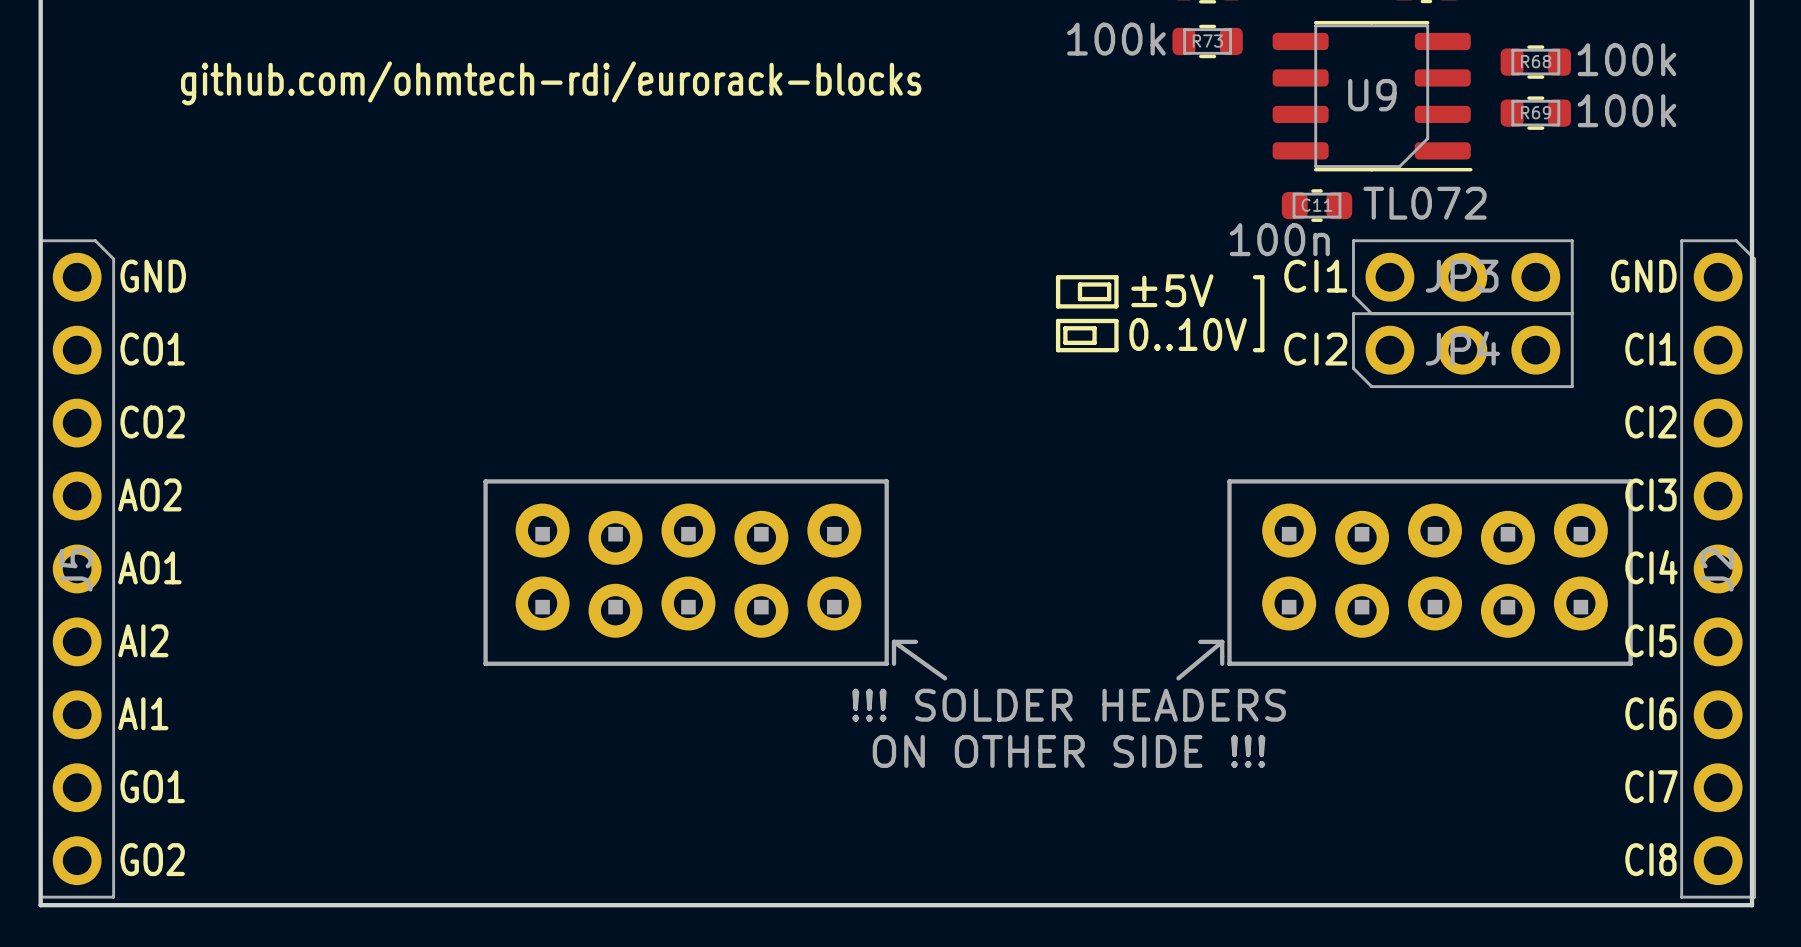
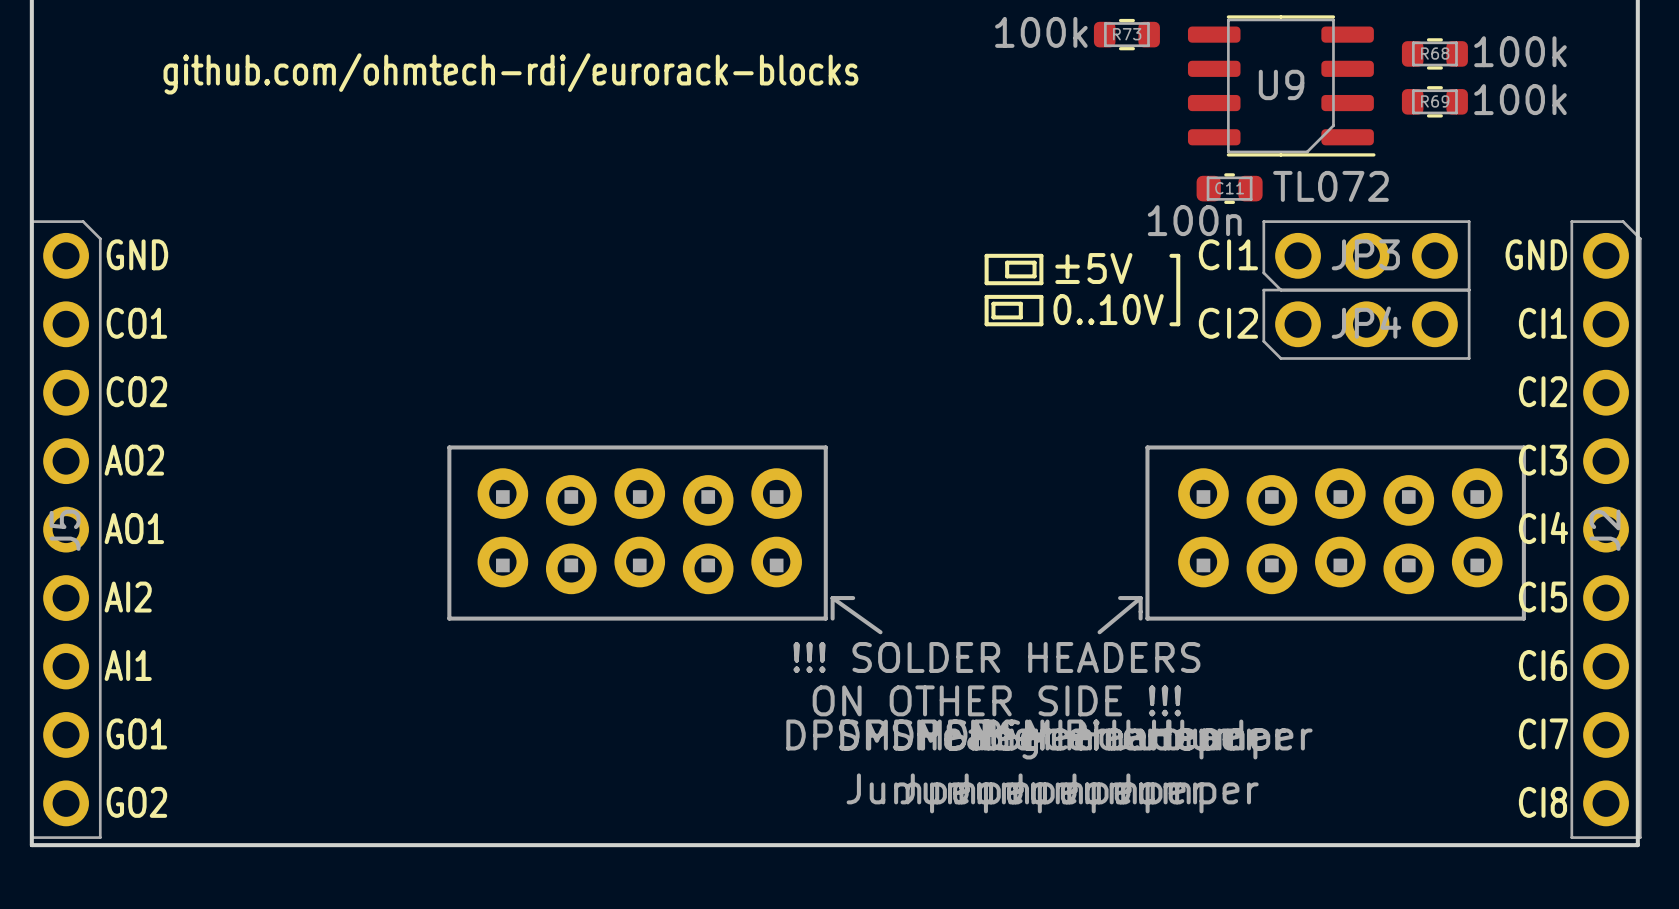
drawing: none -> [786, 719, 1313, 814]

